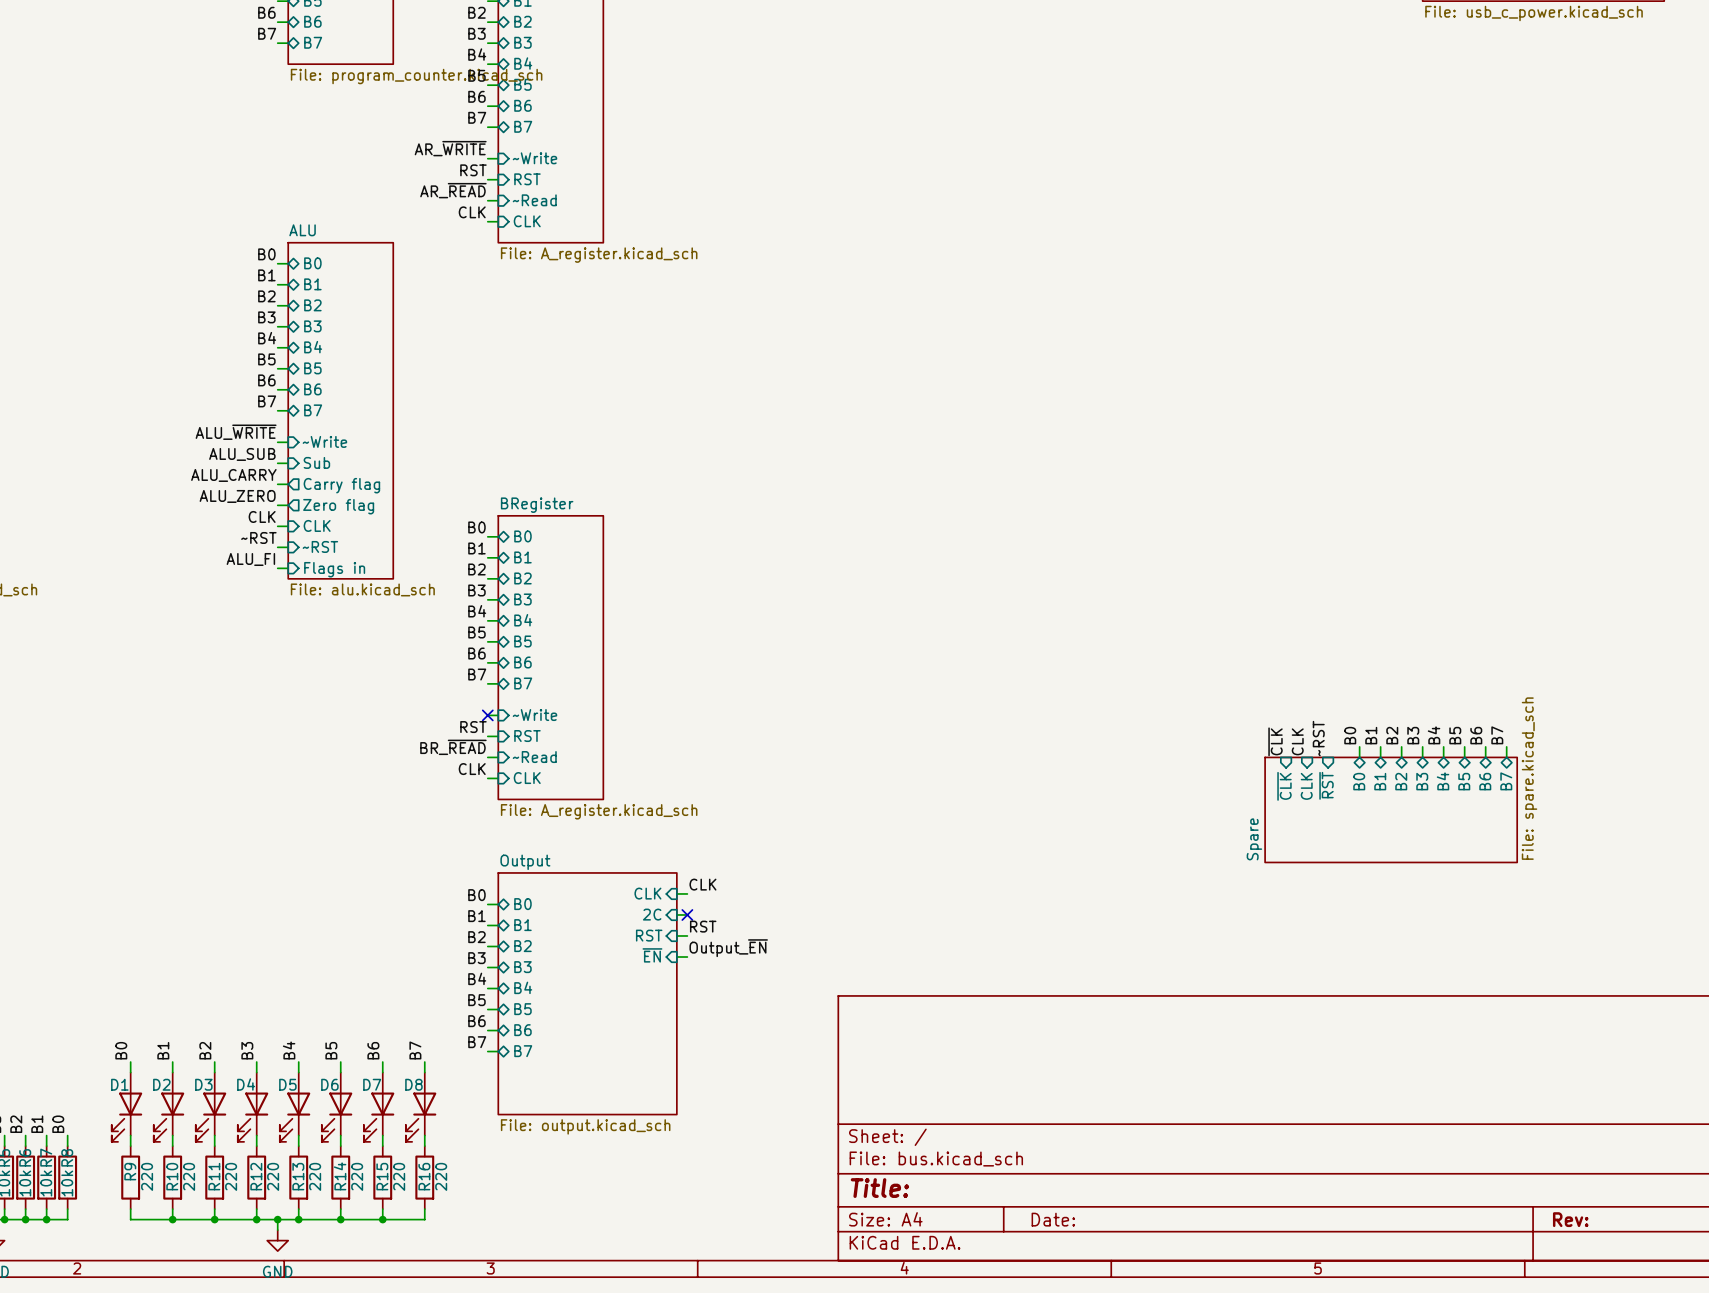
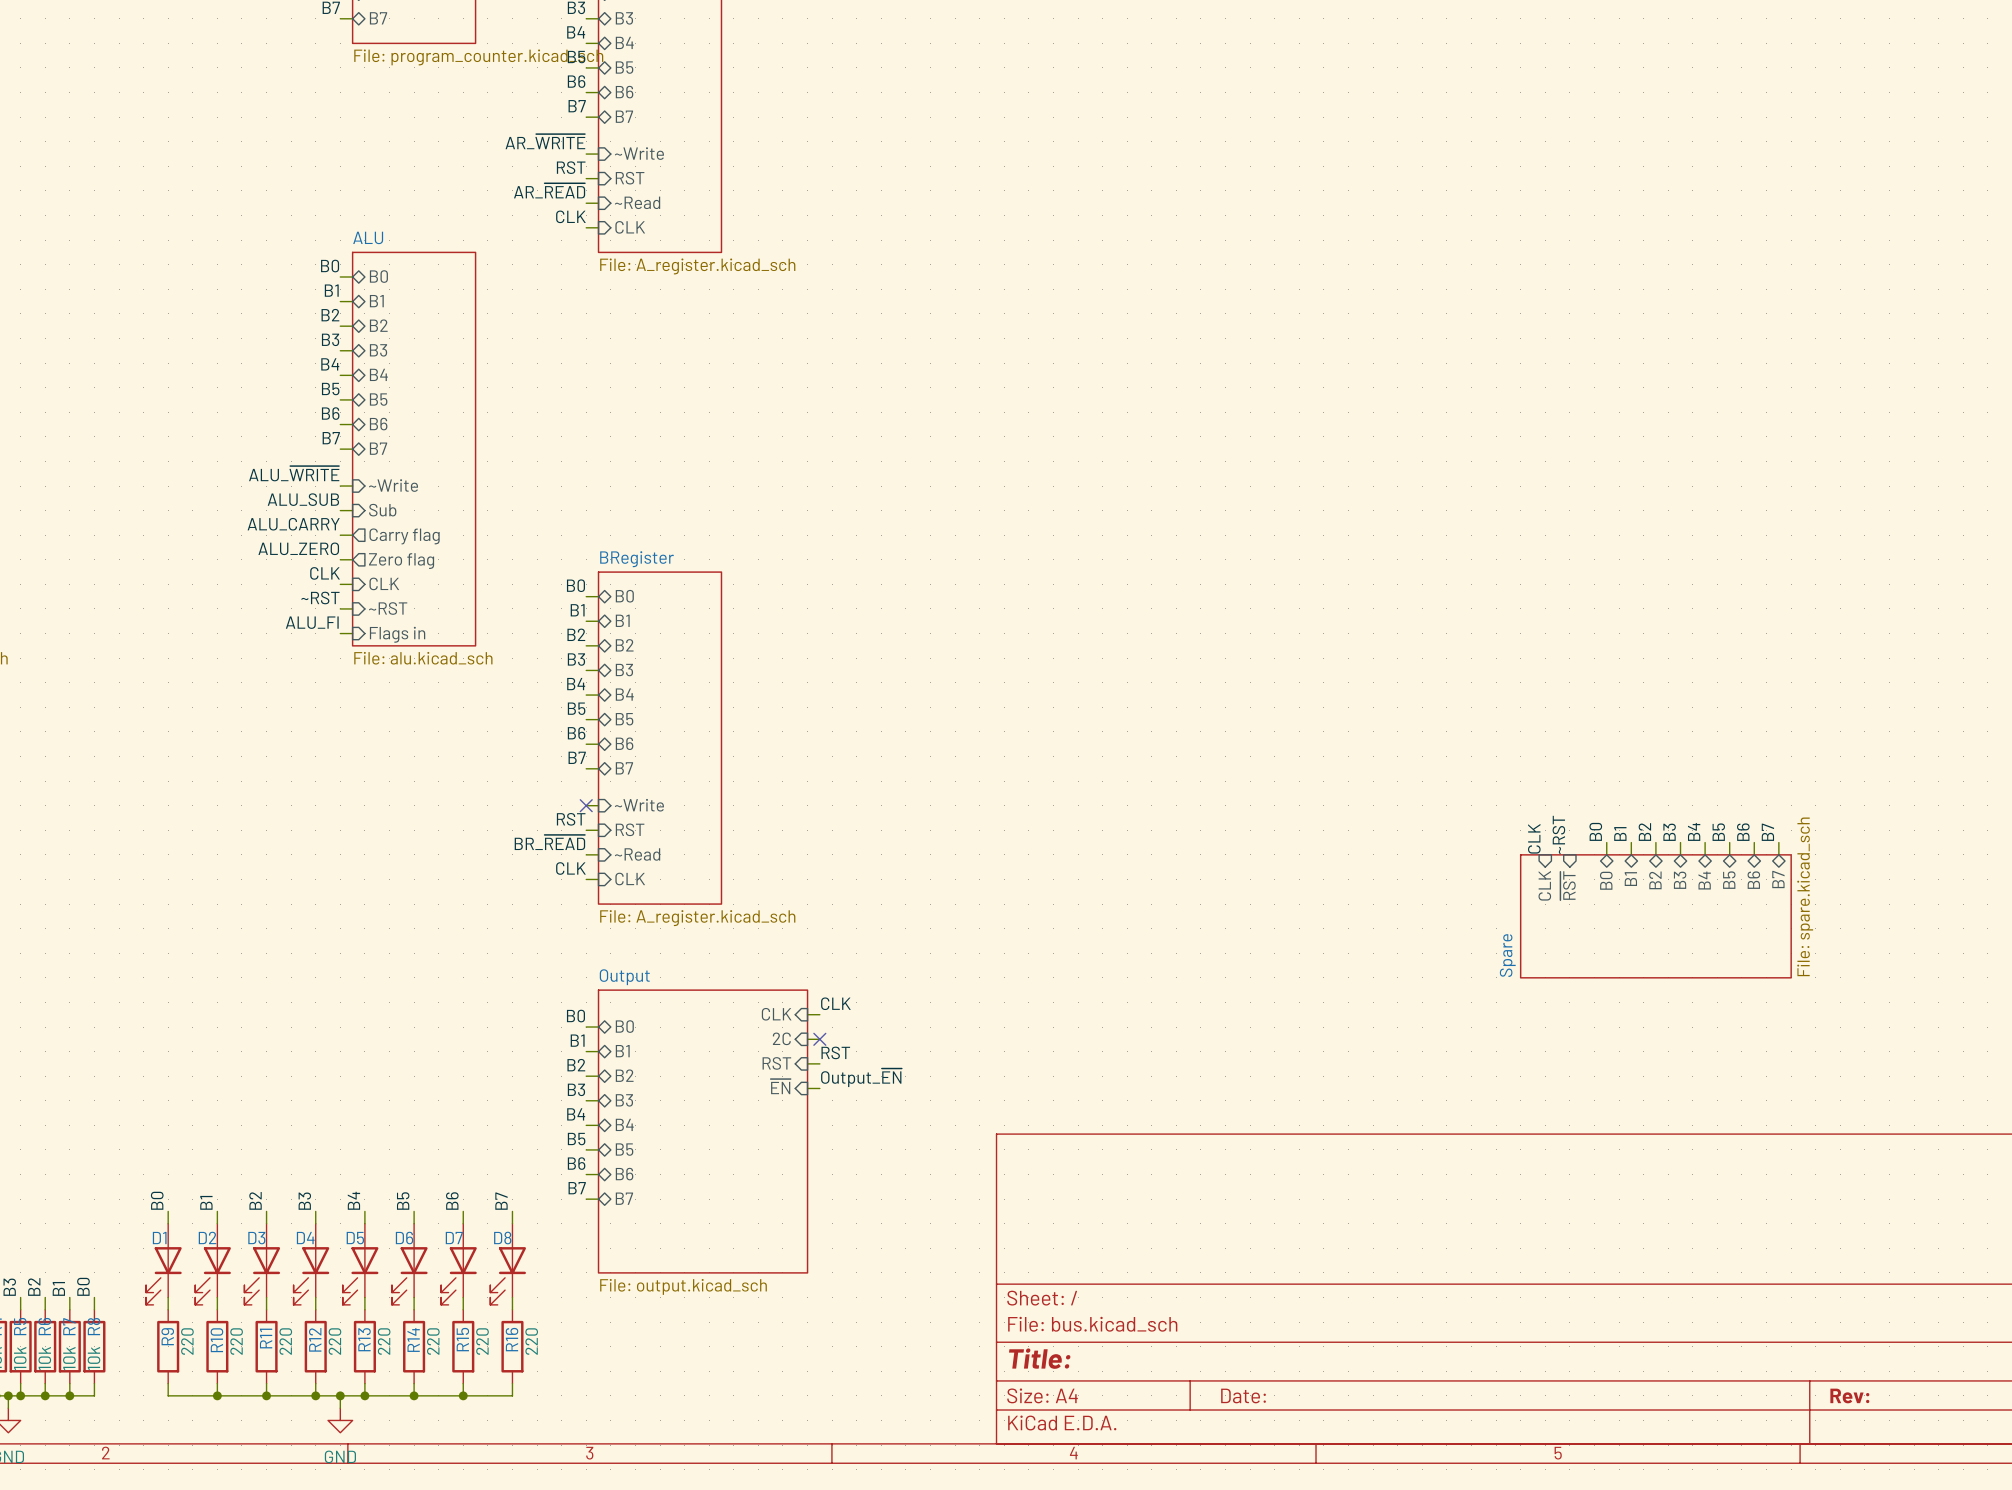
label: ~{CLK} (1275, 741) -> none
sheet pin: ~{CLK} (1284, 786) -> none
sheet Spare: File: spare.kicad_sch (1391, 809) -> none
sheet Spare: none -> File: spare.kicad_sch (1655, 916)

